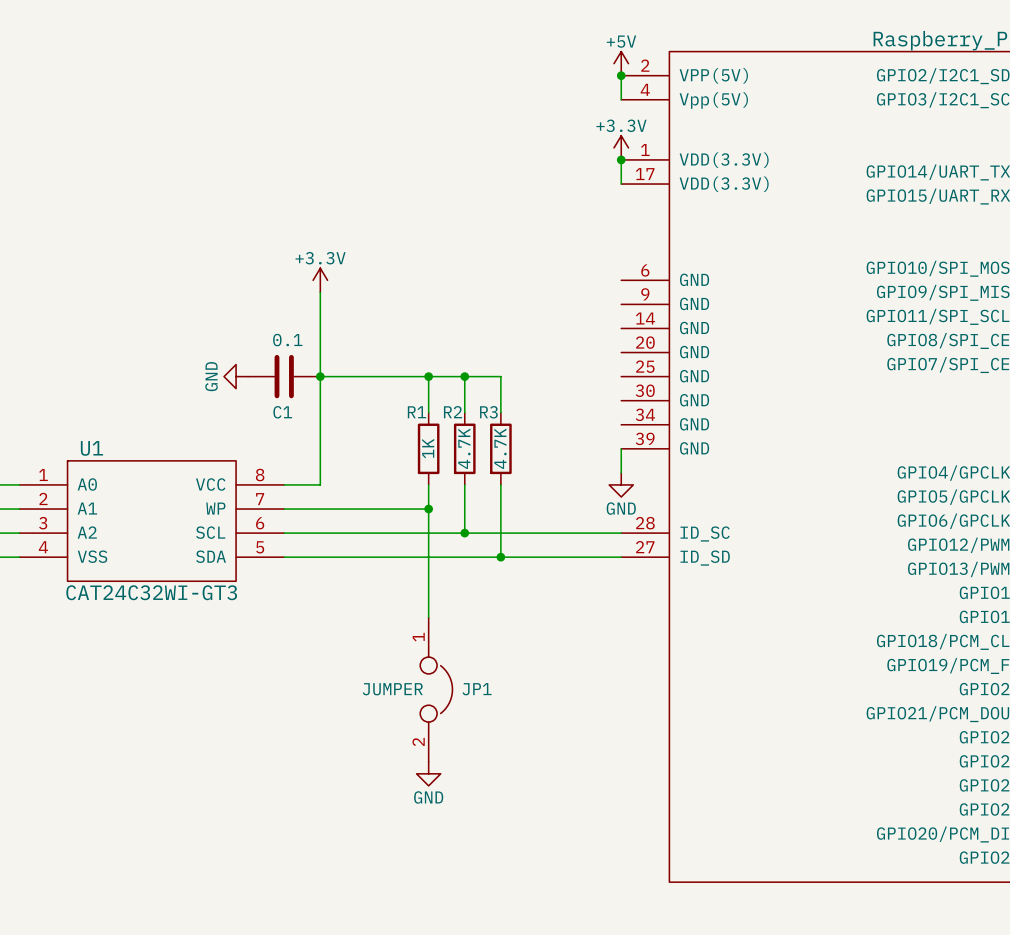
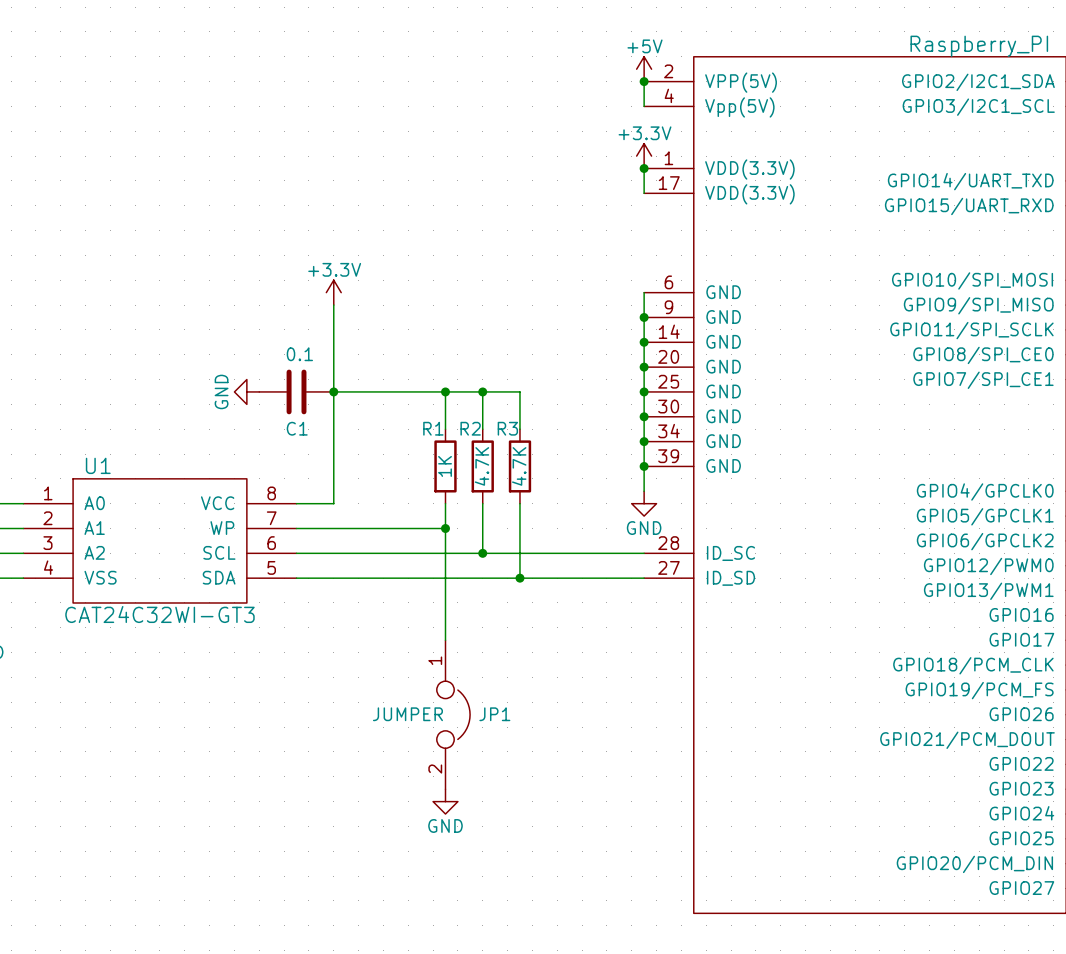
wire: none -> (644, 292) (644, 466)
junction: none -> (644, 317)
junction: none -> (644, 342)
junction: none -> (644, 367)
junction: none -> (644, 391)
junction: none -> (644, 416)
junction: none -> (644, 441)
junction: none -> (644, 466)

